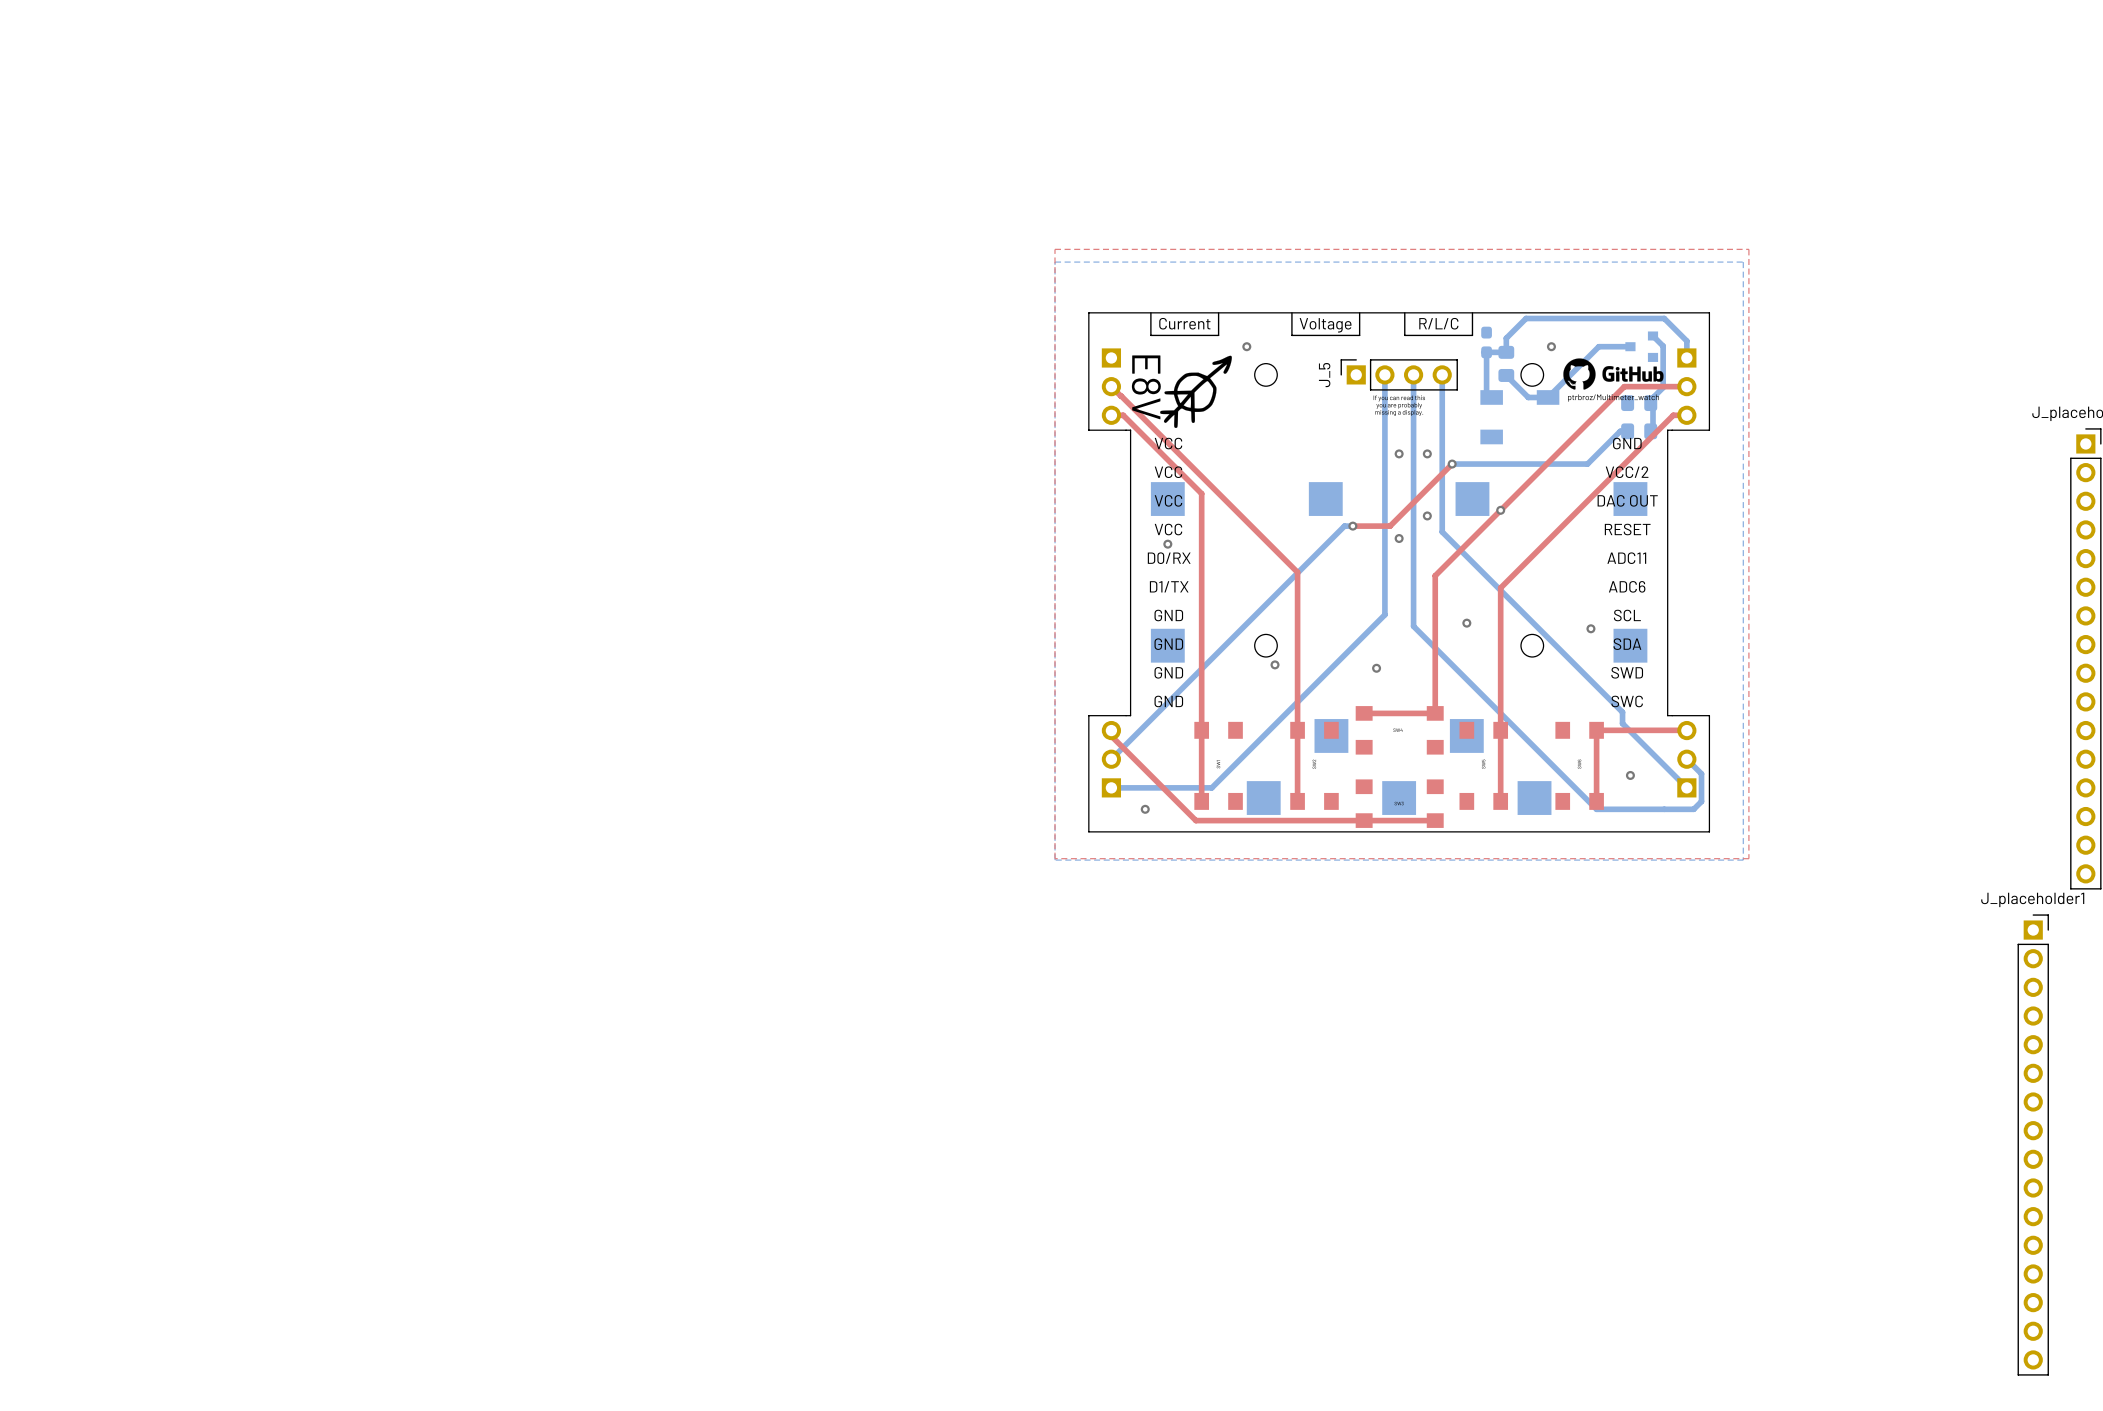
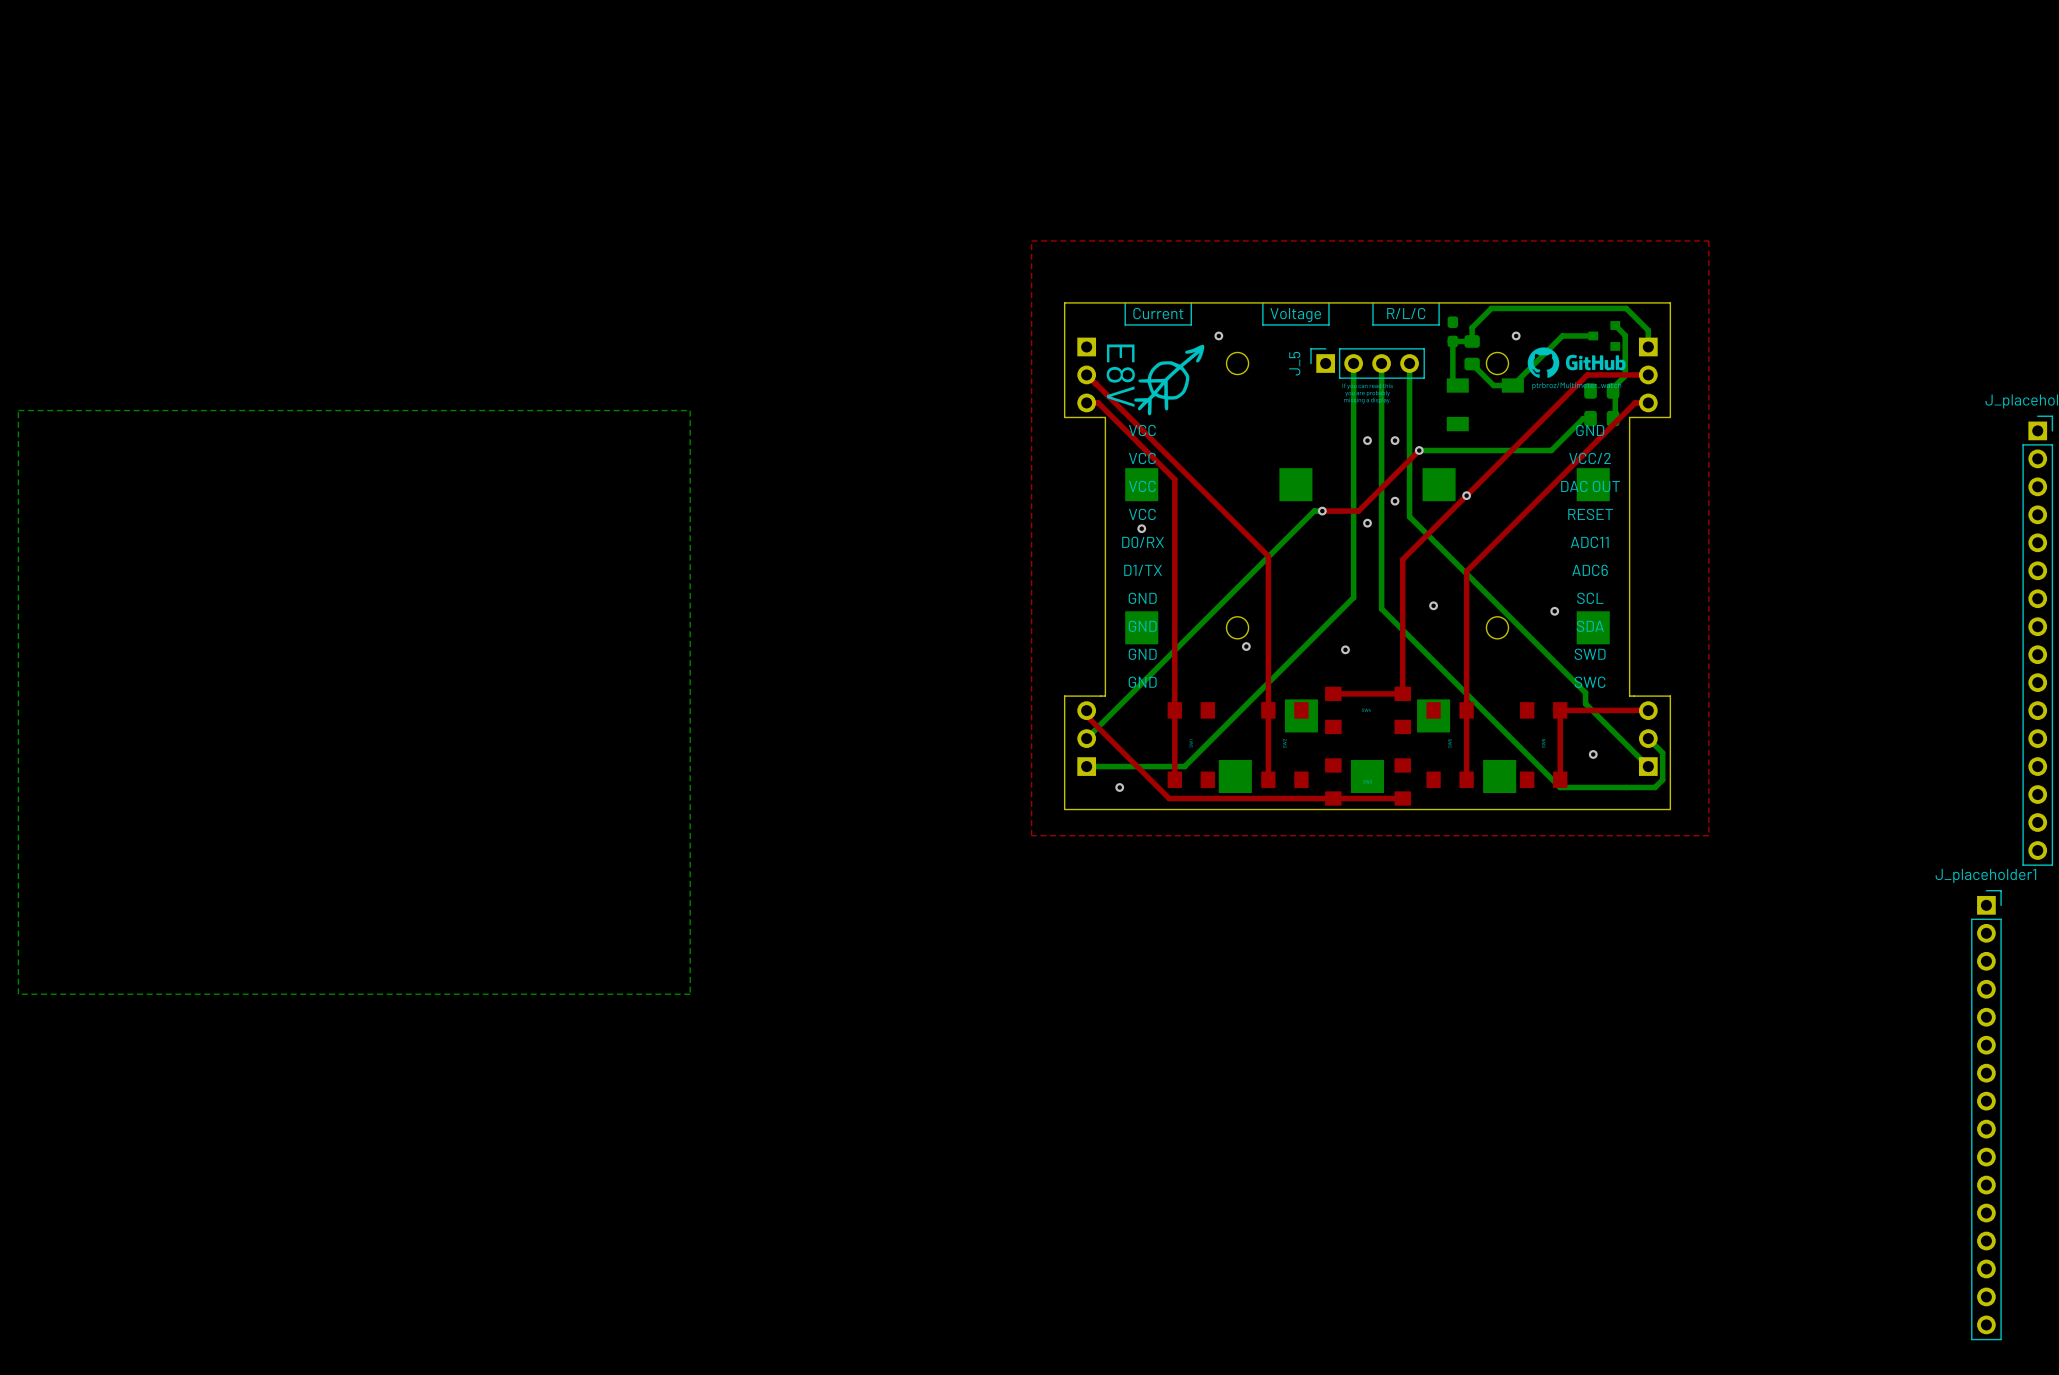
bottom zone outline: (1055, 262) (1055, 860) (1743, 860) (1743, 262) (1055, 262) -> none
bottom zone outline: none -> (18, 410) (18, 994) (690, 994) (690, 410) (18, 410)

